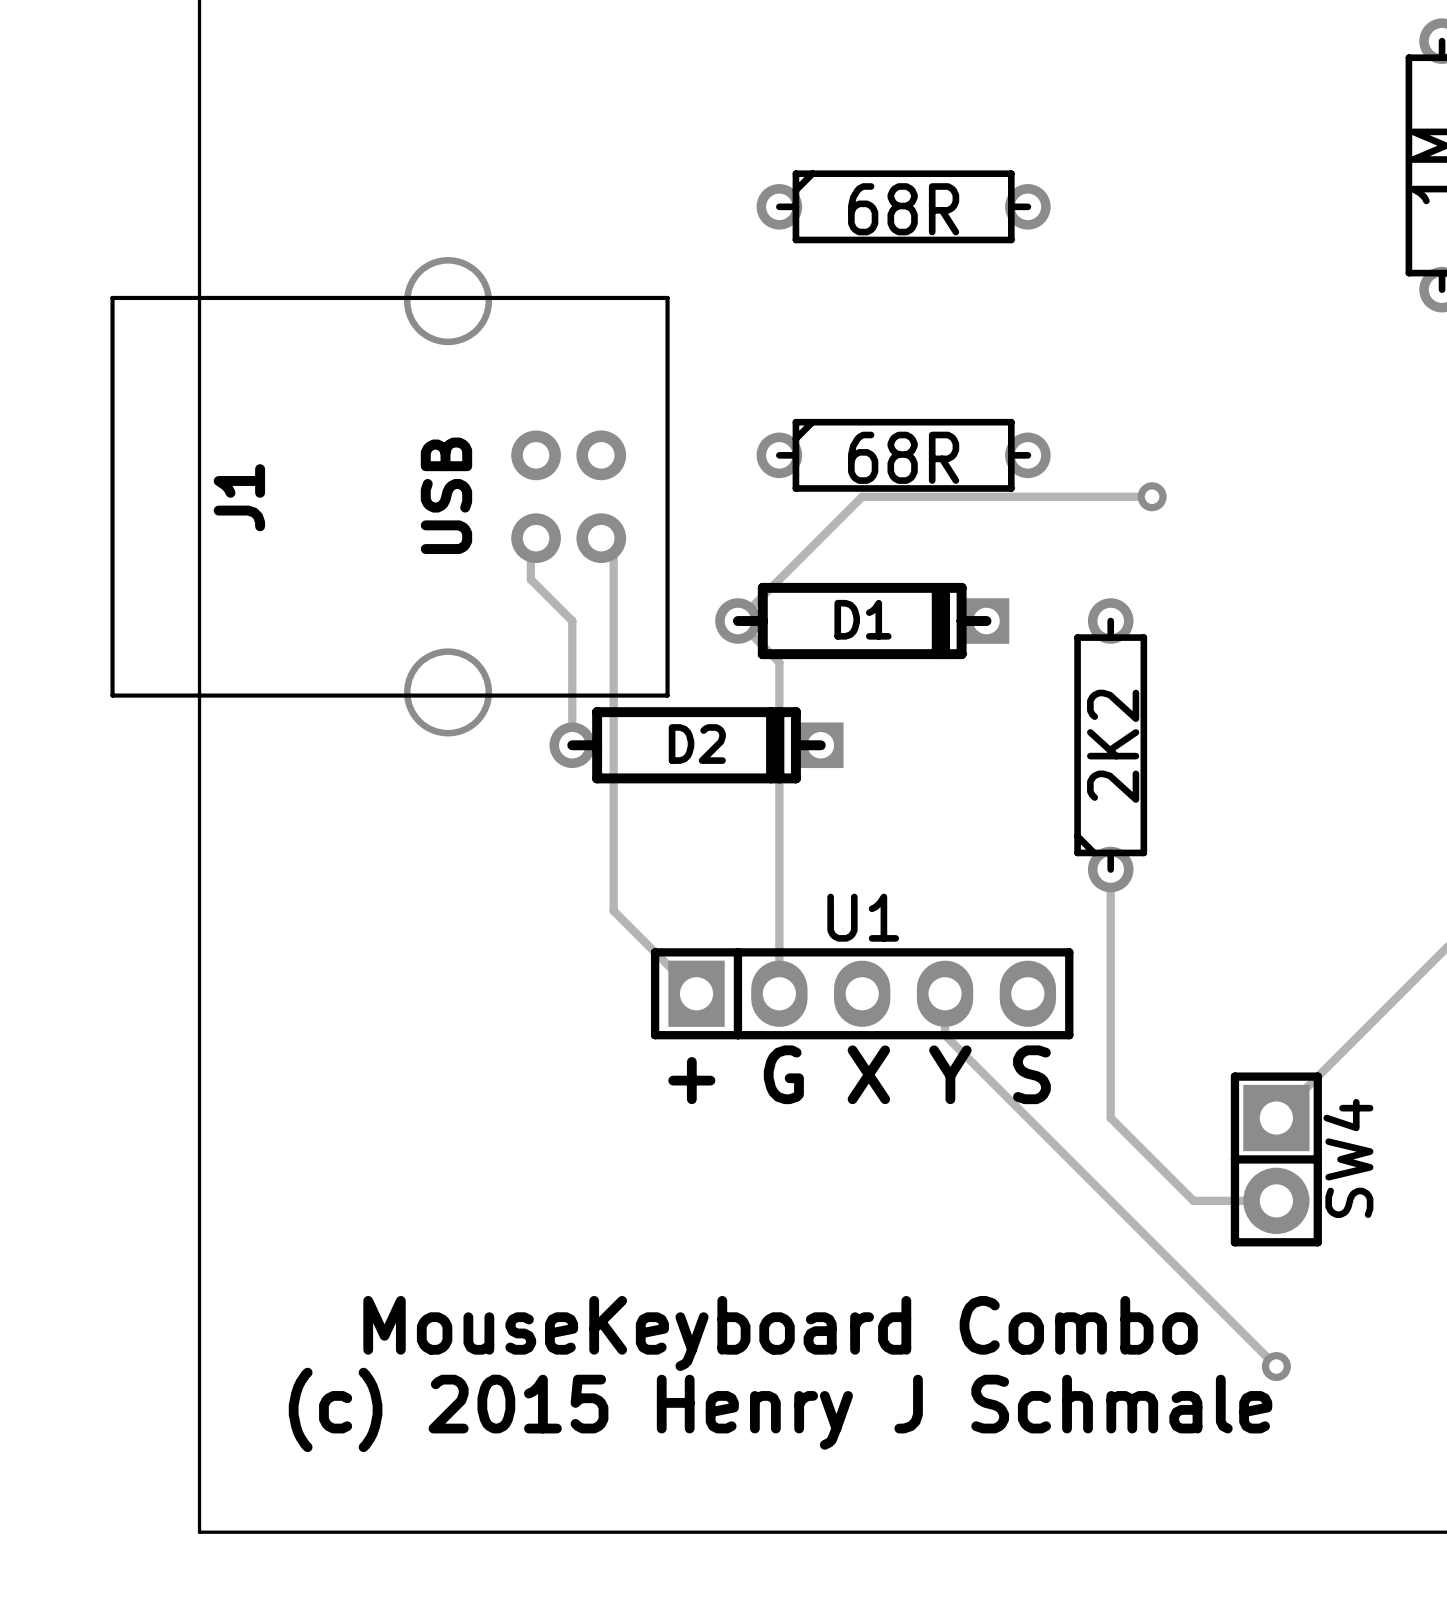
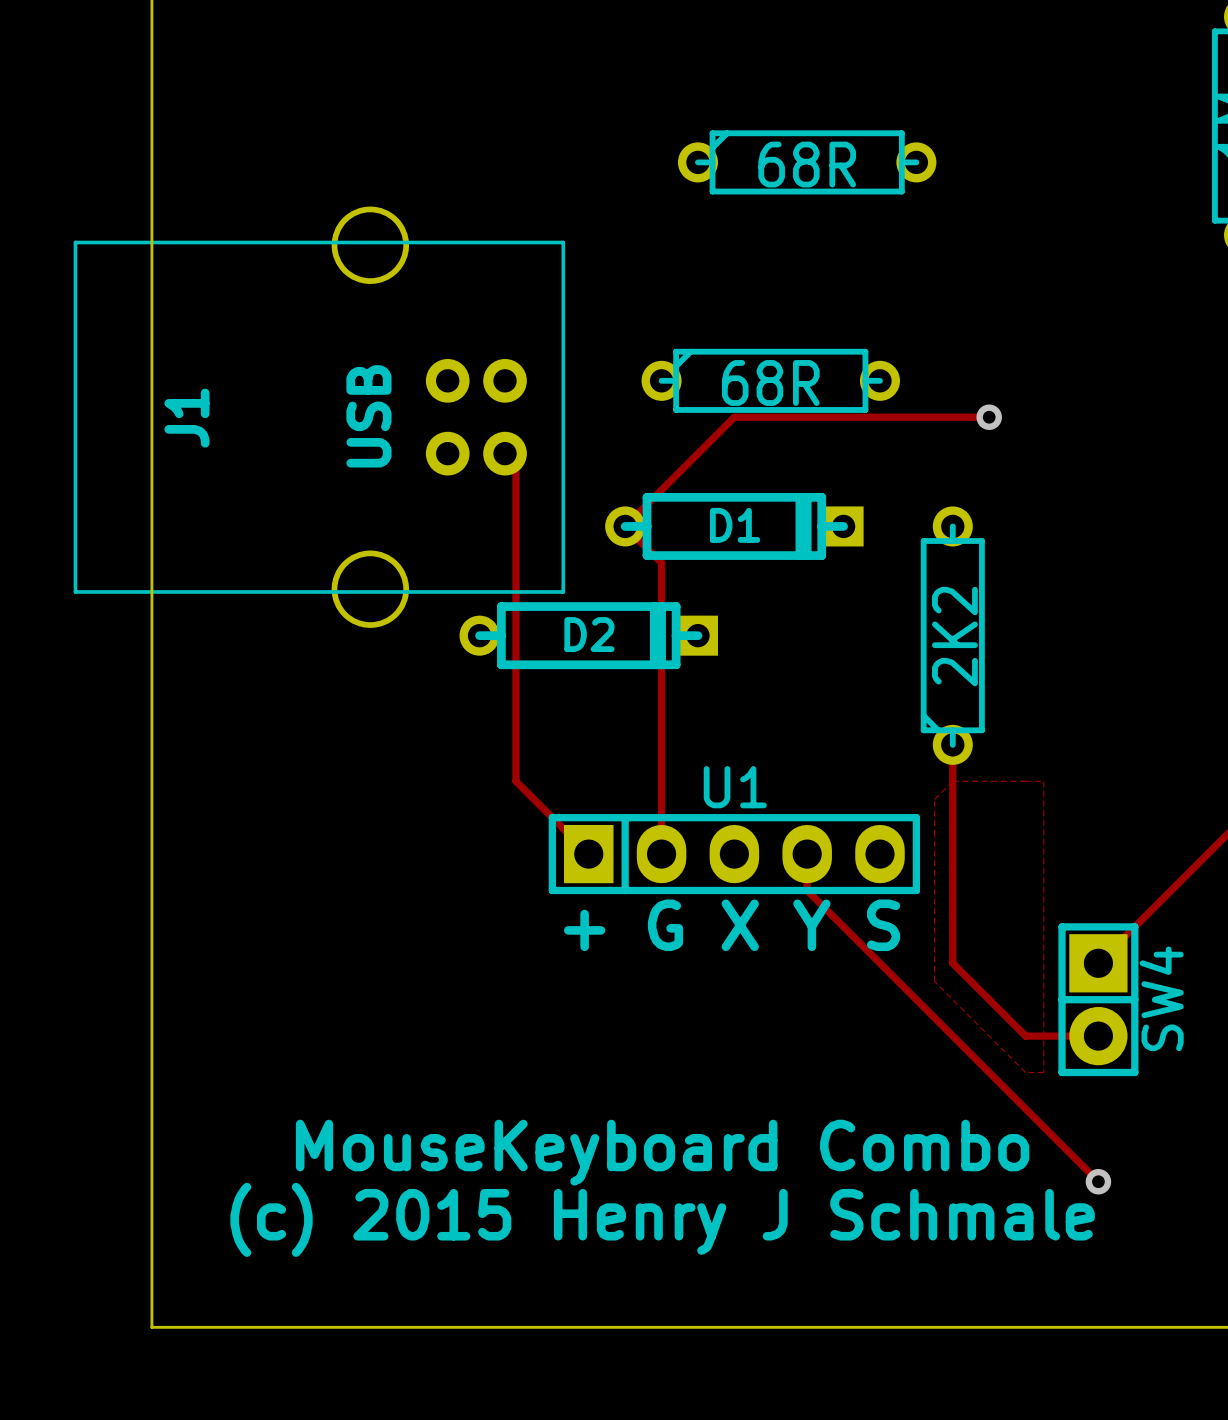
part position: (903, 206) -> (807, 162)
track: (530, 538) (530, 579) (572, 621) (572, 745) -> none
zone outline: none -> (952, 781) (934, 799) (934, 981) (1025, 1072) (1043, 1072) (1043, 781) (952, 781)

